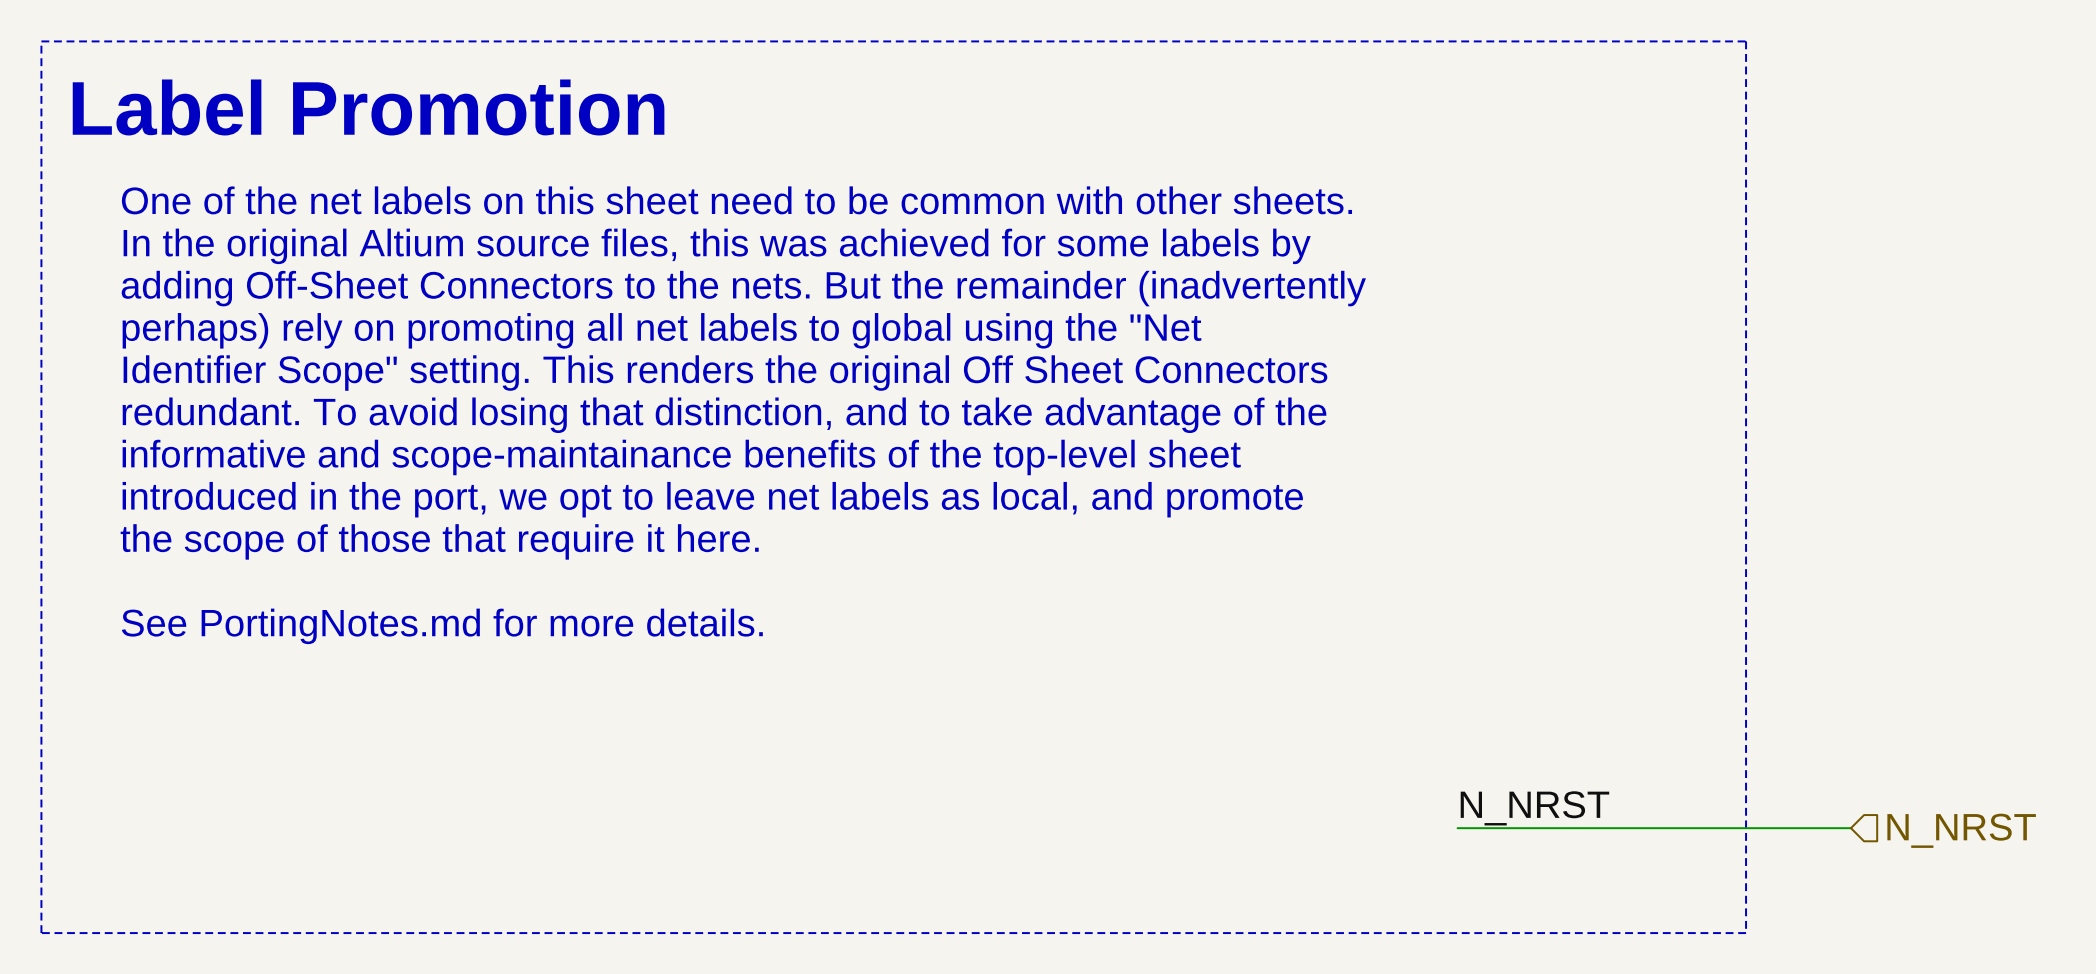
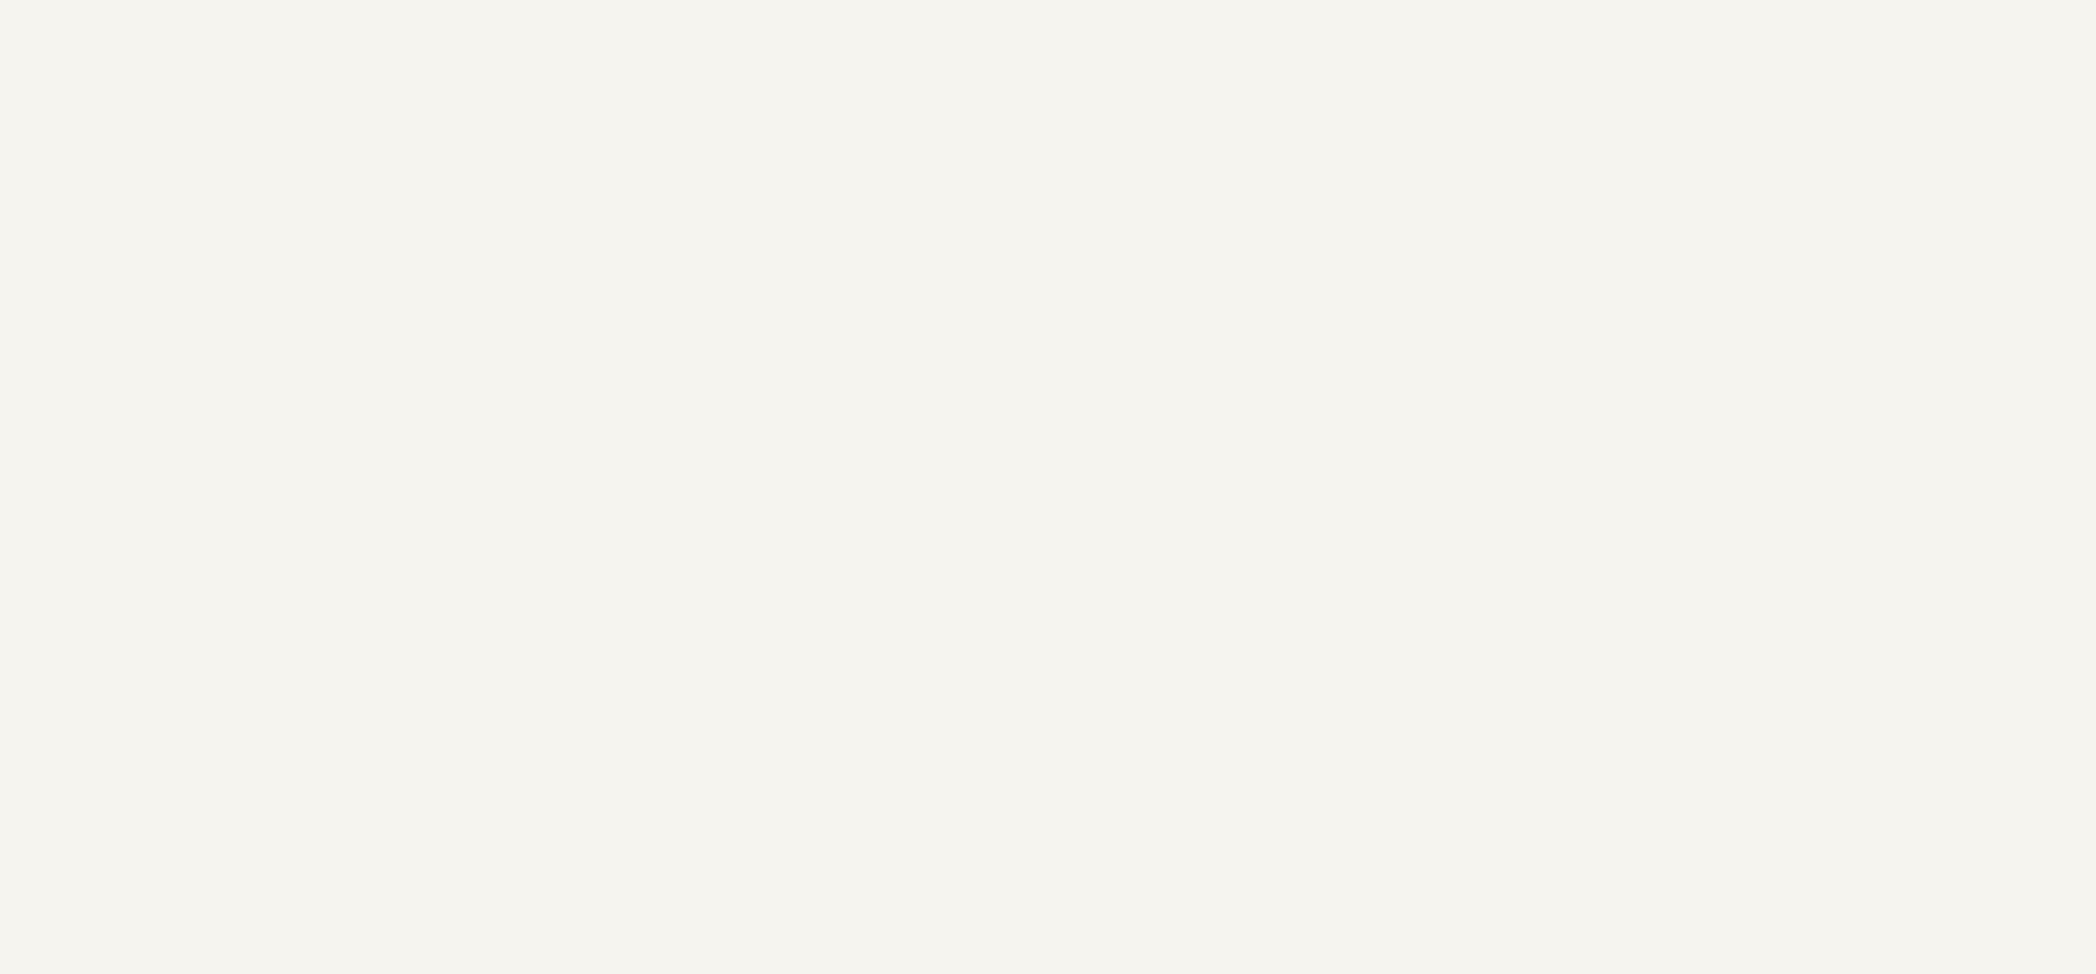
line: (41, 41) (1746, 41) (1746, 933) (41, 933) (41, 41) -> none
text: Label Promotion (368, 107) -> none
text: One of the net labels on this sheet need to be common with other sheets. (736, 200) -> none
text: In the original Altium source files, this was achieved for some labels by (717, 246) -> none
text: adding Off-Sheet Connectors to the nets. But the remainder (inadvertently (743, 288) -> none
text: perhaps) rely on promoting all net labels to global using the "Net (661, 330) -> none
text: Identifier Scope" setting. This renders the original Off Sheet Connectors (725, 373) -> none
text: redundant. To avoid losing that distinction, and to take advantage of the (724, 415) -> none
text: informative and scope-maintainance benefits of the top-level sheet (681, 457) -> none
text: introduced in the port, we opt to leave net labels as local, and promote (712, 499) -> none
text: the scope of those that require it here. (439, 541) -> none
text: See PortingNotes.md for more details. (442, 626) -> none
label: N_NRST (1534, 808) -> none
wire: (1457, 828) (1850, 828) -> none
hierarchical label: N_NRST (1961, 830) -> none

